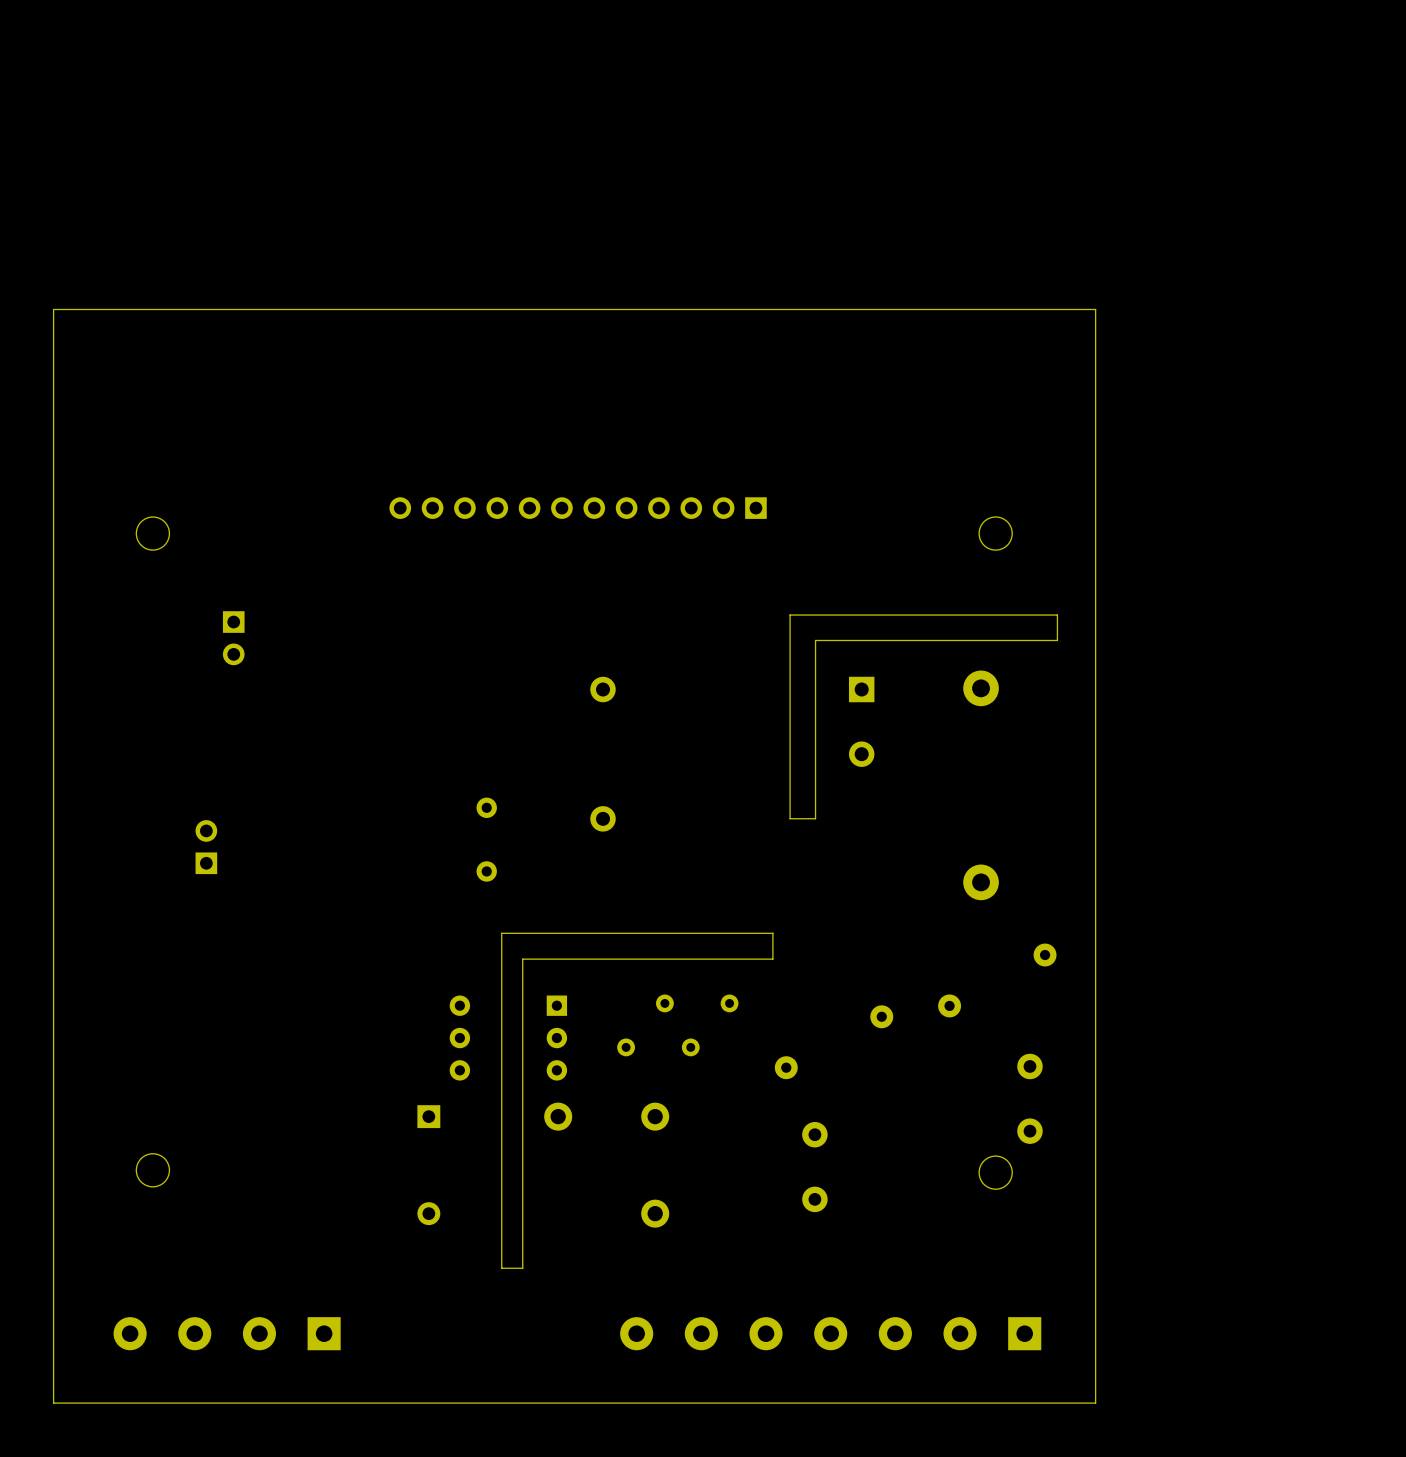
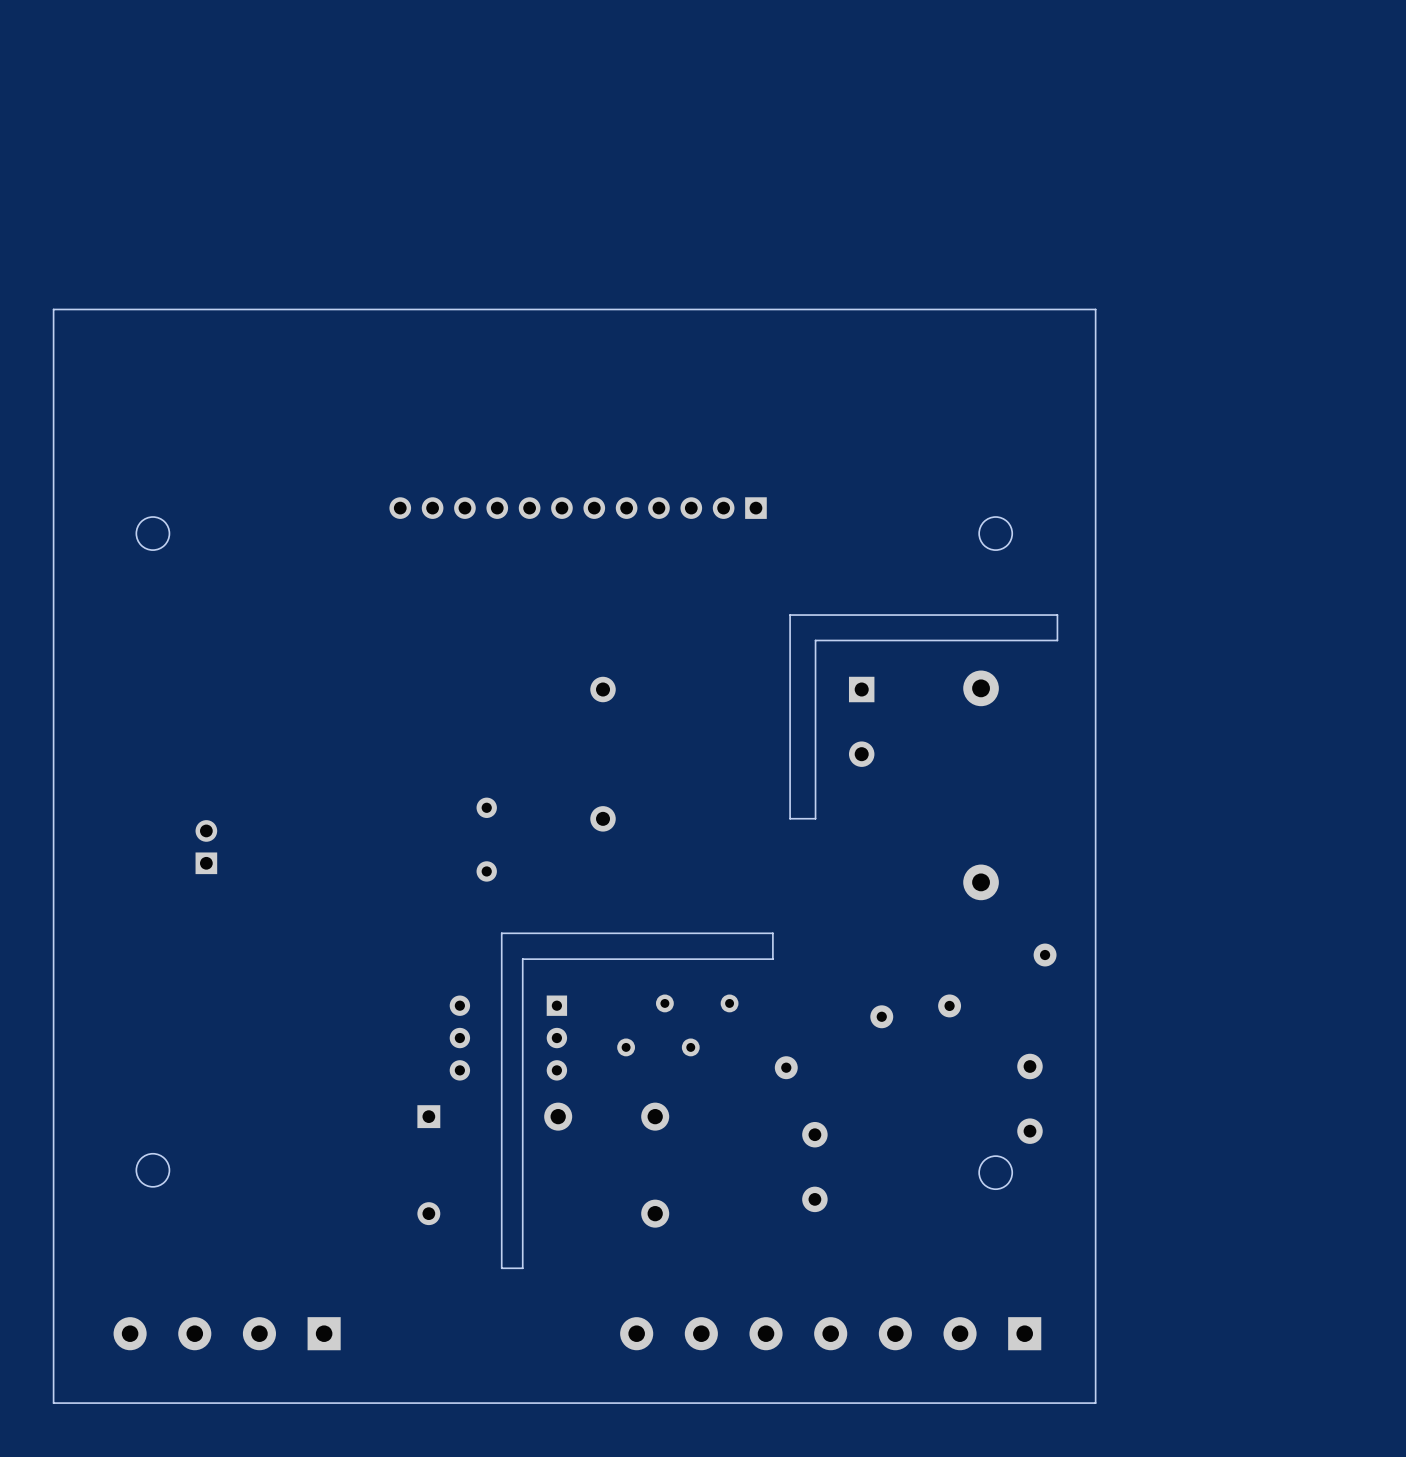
part: (233, 638) -> none

